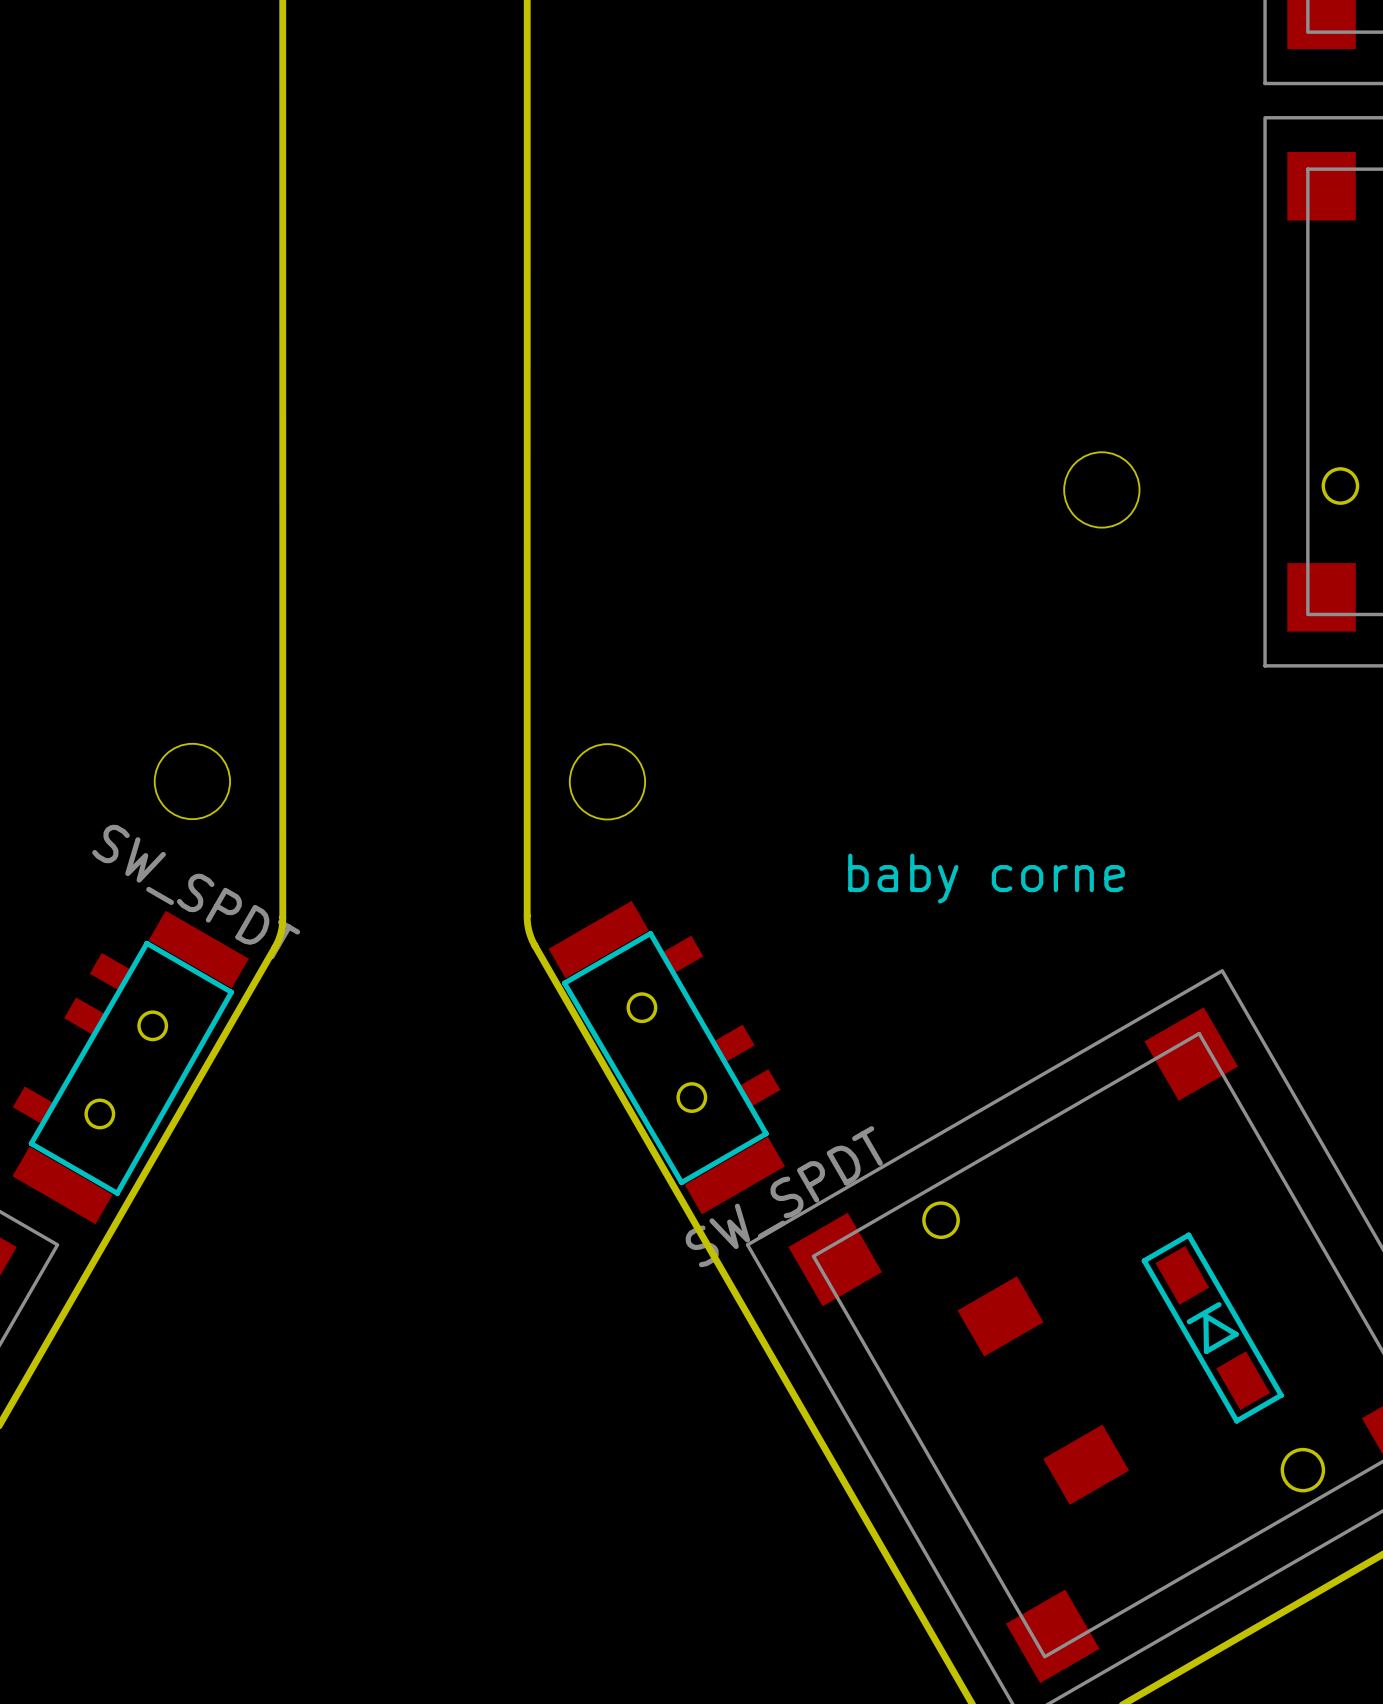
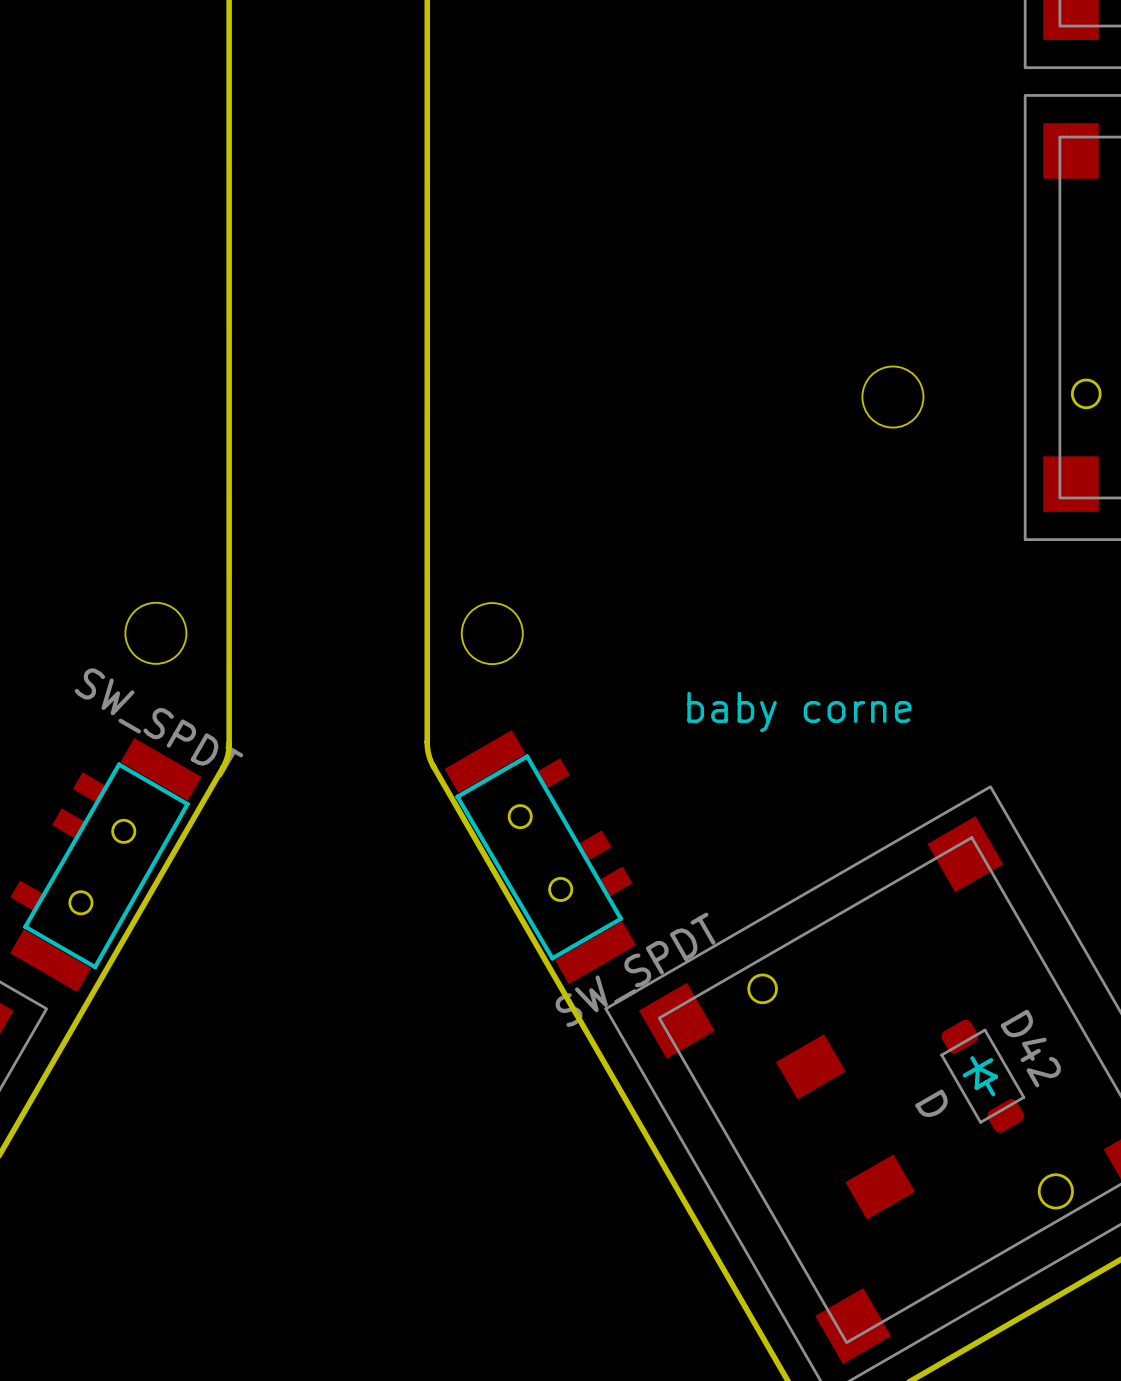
part: (1212, 1328) -> none
D42: none -> D (982, 1076)

